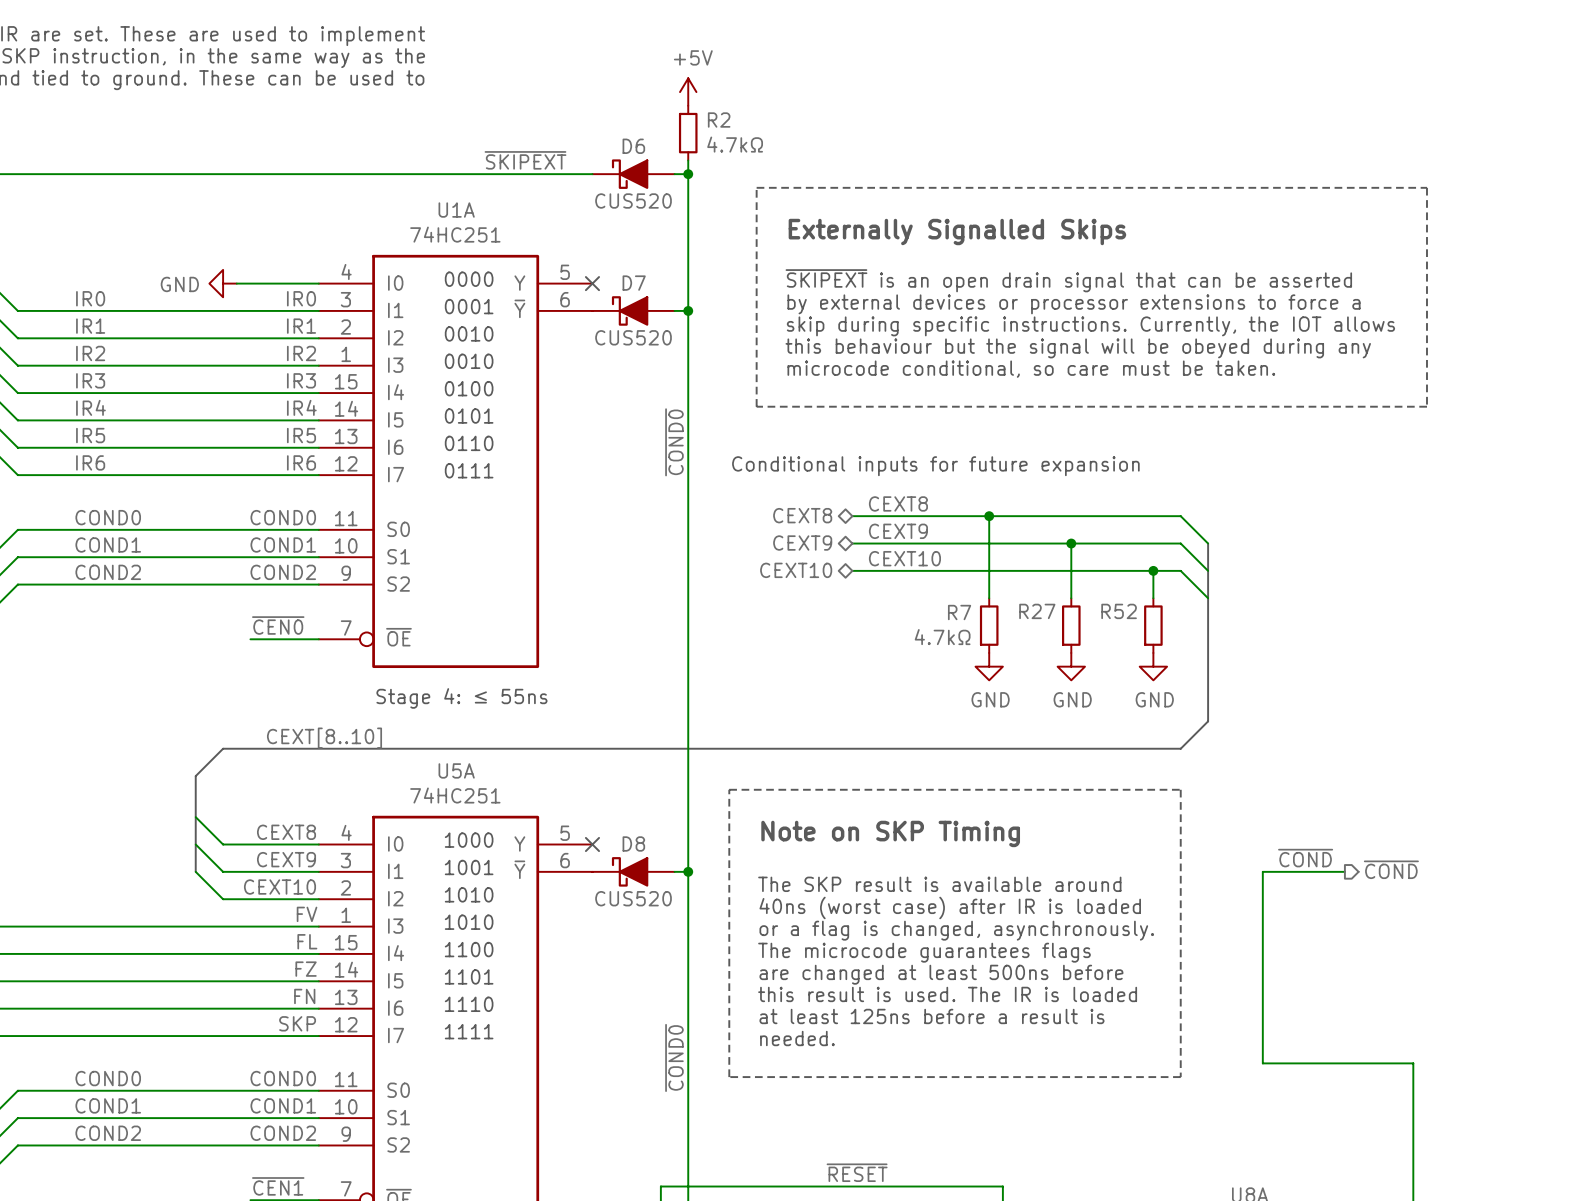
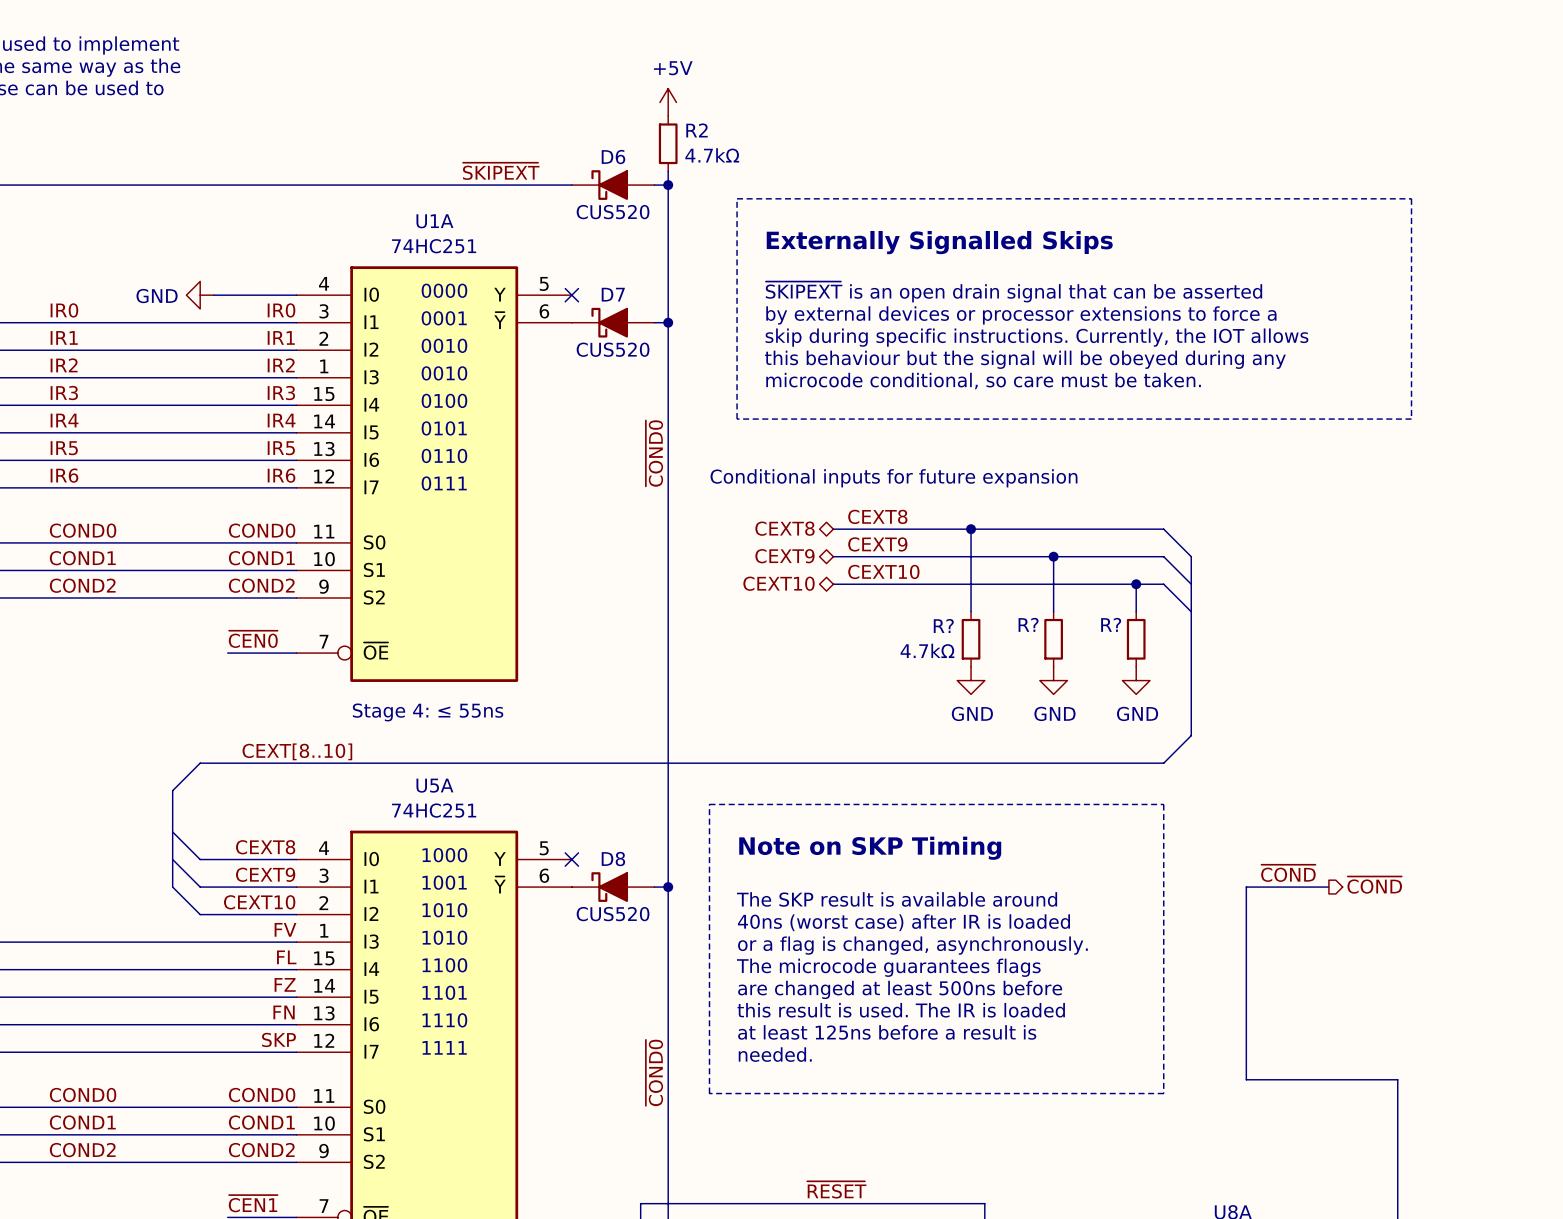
R27 name: R27 (1037, 611) -> R? (1028, 624)
R52 name: R52 (1119, 611) -> R? (1111, 624)
R7 name: R7 (959, 612) -> R? (943, 625)

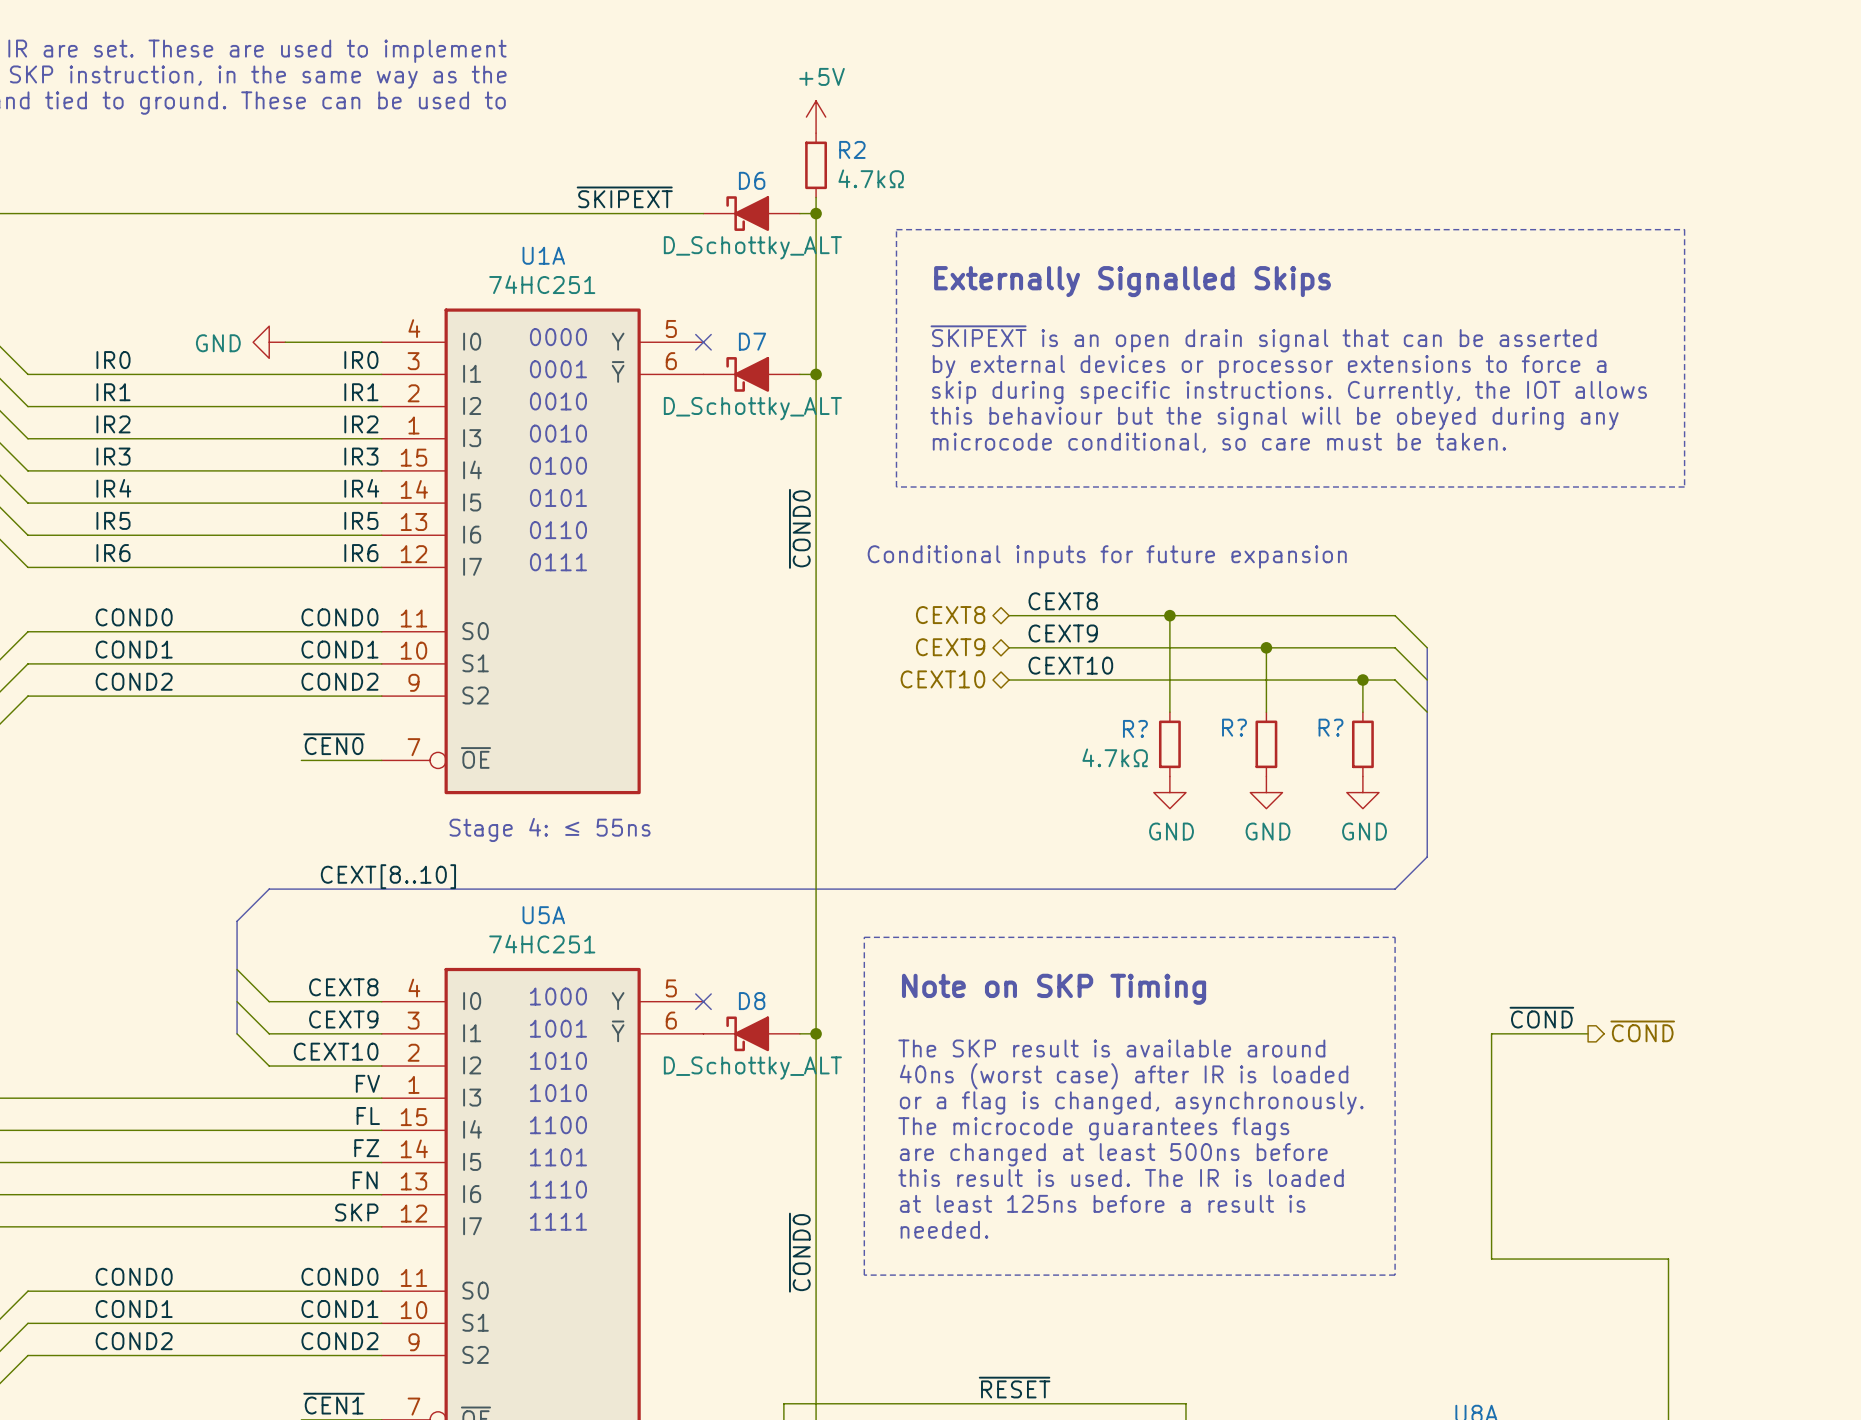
D6 value: CUS520 (613, 212) -> D_Schottky_ALT (752, 247)
D7 value: CUS520 (613, 349) -> D_Schottky_ALT (752, 408)
D8 value: CUS520 (613, 914) -> D_Schottky_ALT (752, 1068)

